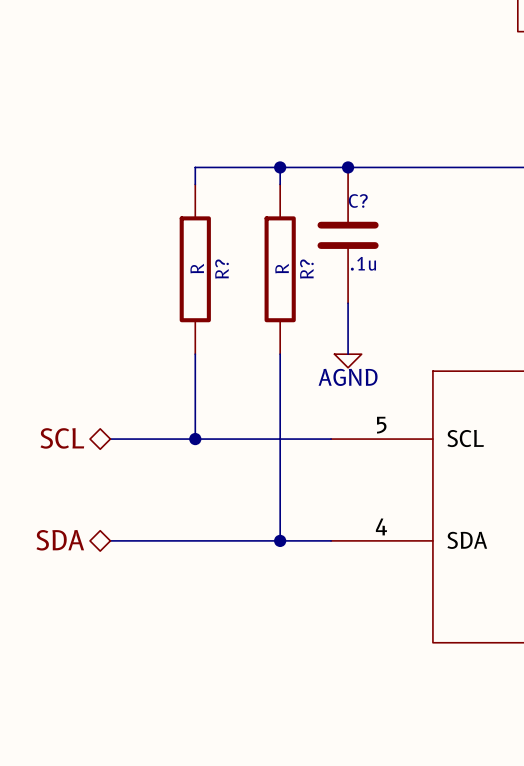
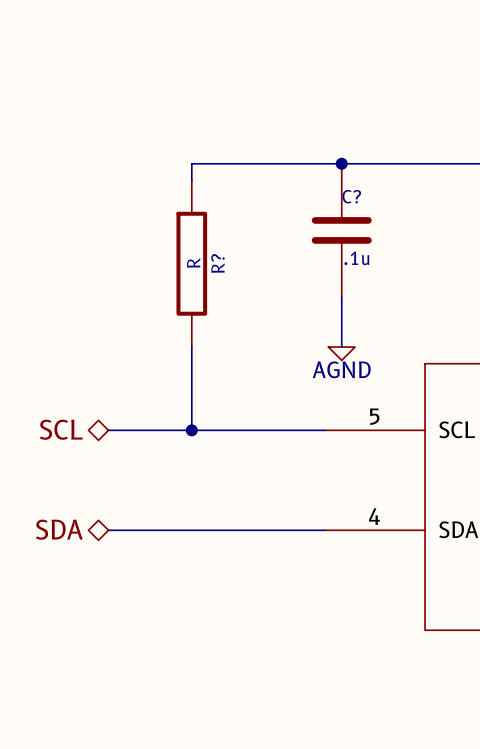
wire: (280, 167) (280, 184) -> none
junction: (280, 167) -> none
R?: R (280, 269) -> none
wire: (280, 354) (280, 540) -> none
junction: (280, 540) -> none

